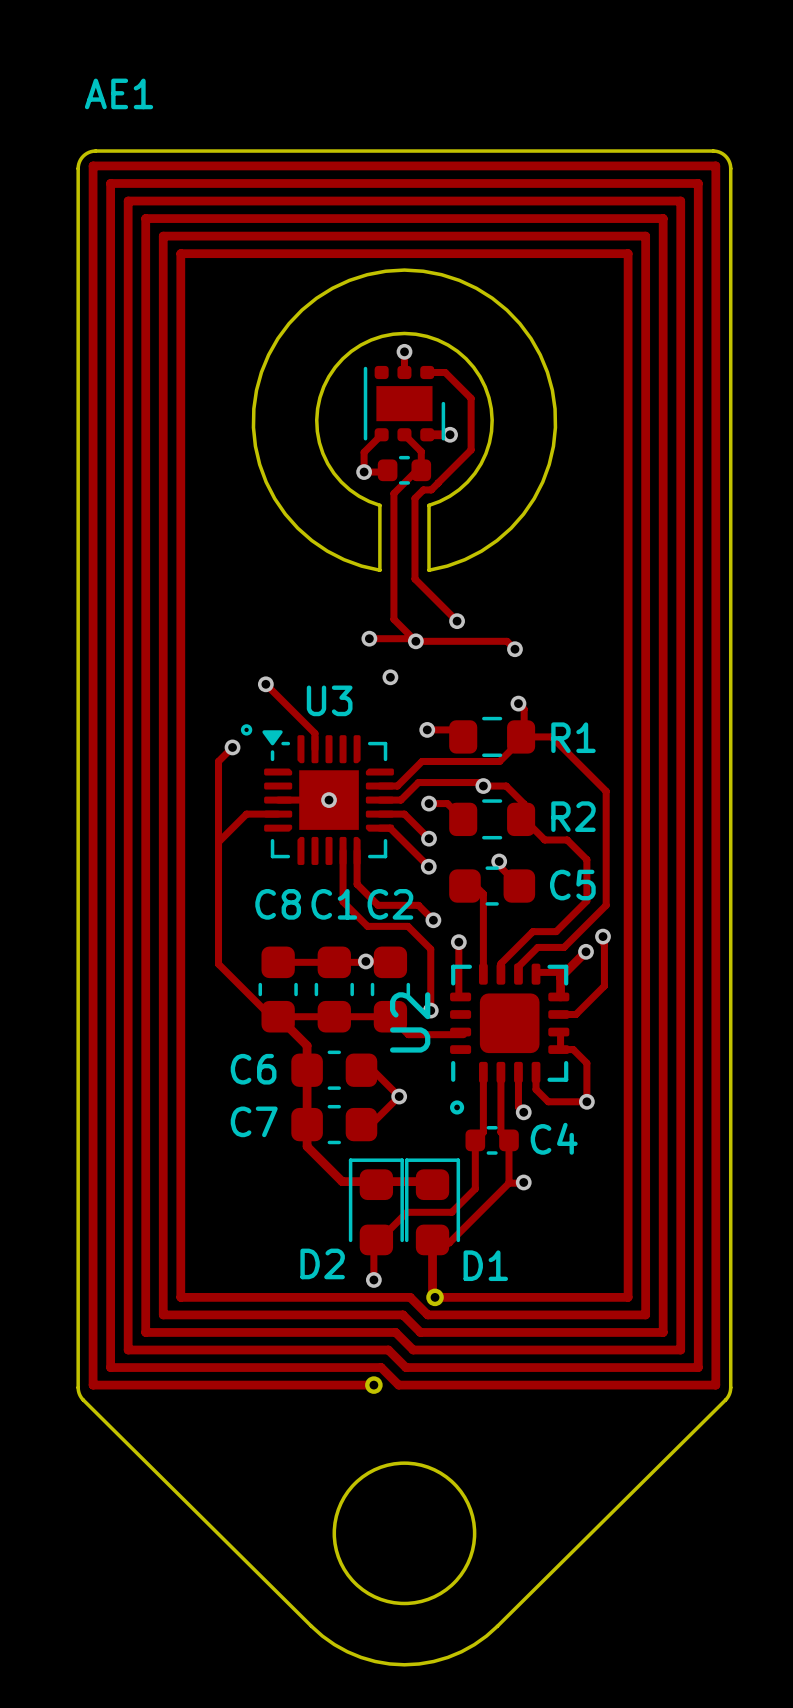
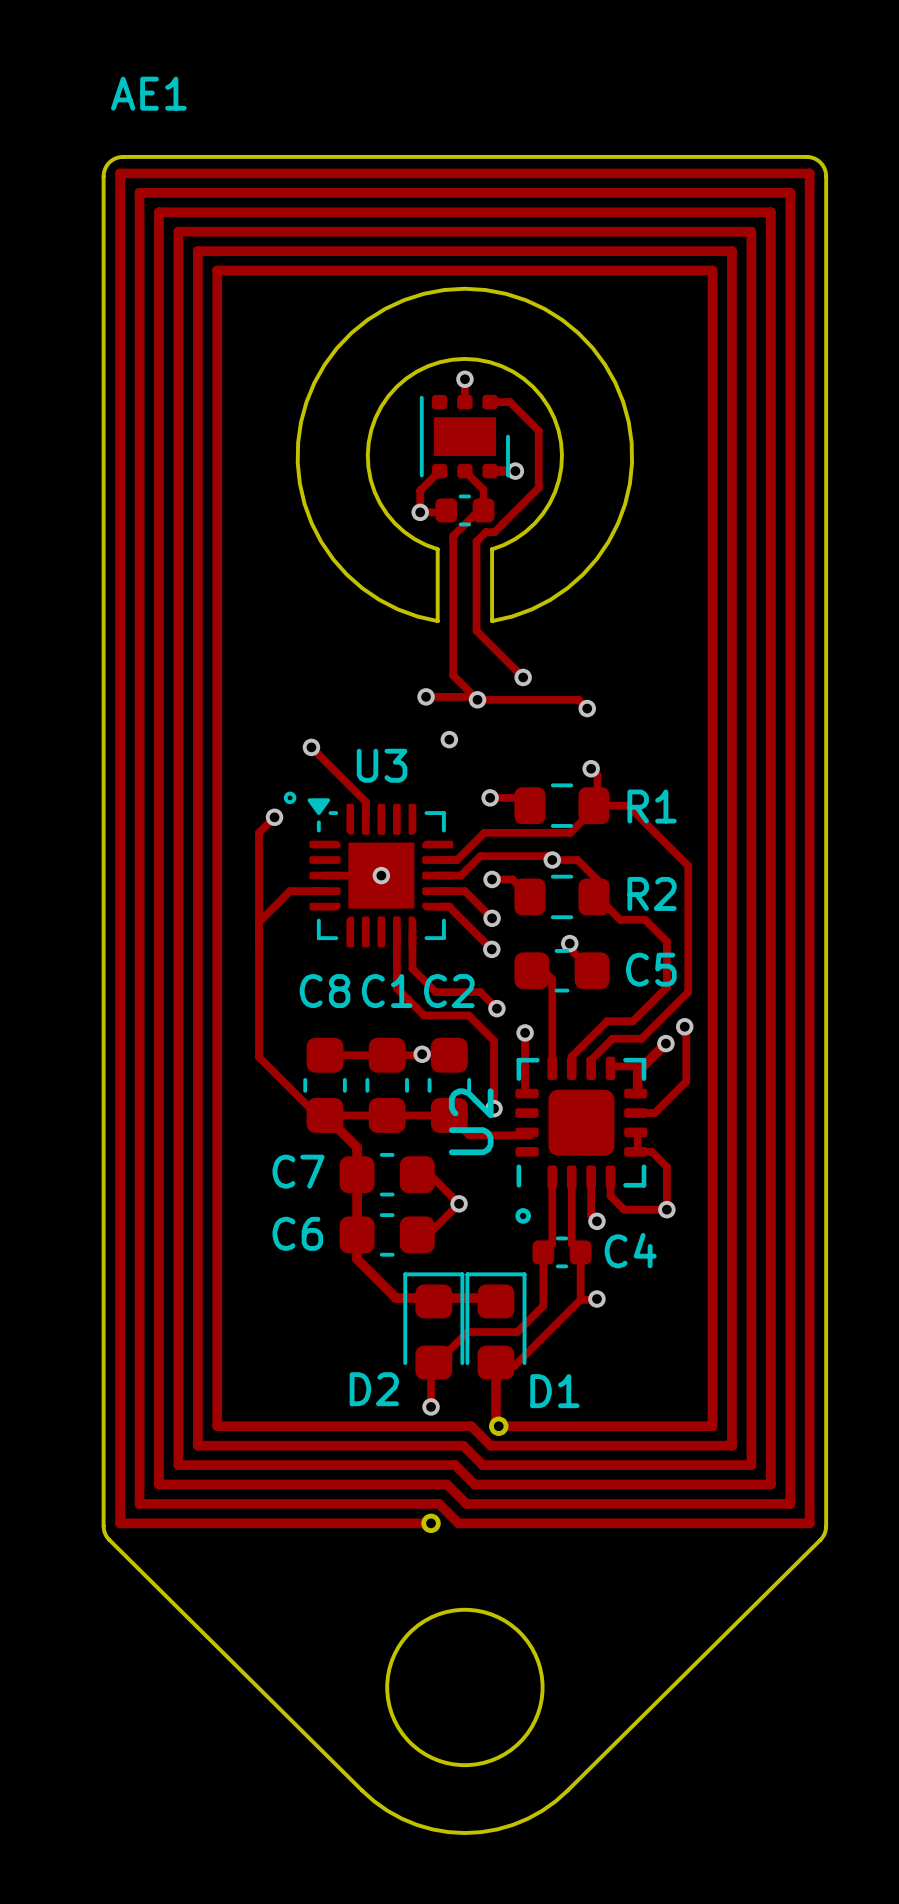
C6 name: C6 (253, 1069) -> C7 (298, 1171)
C7 name: C7 (254, 1121) -> C6 (297, 1233)

